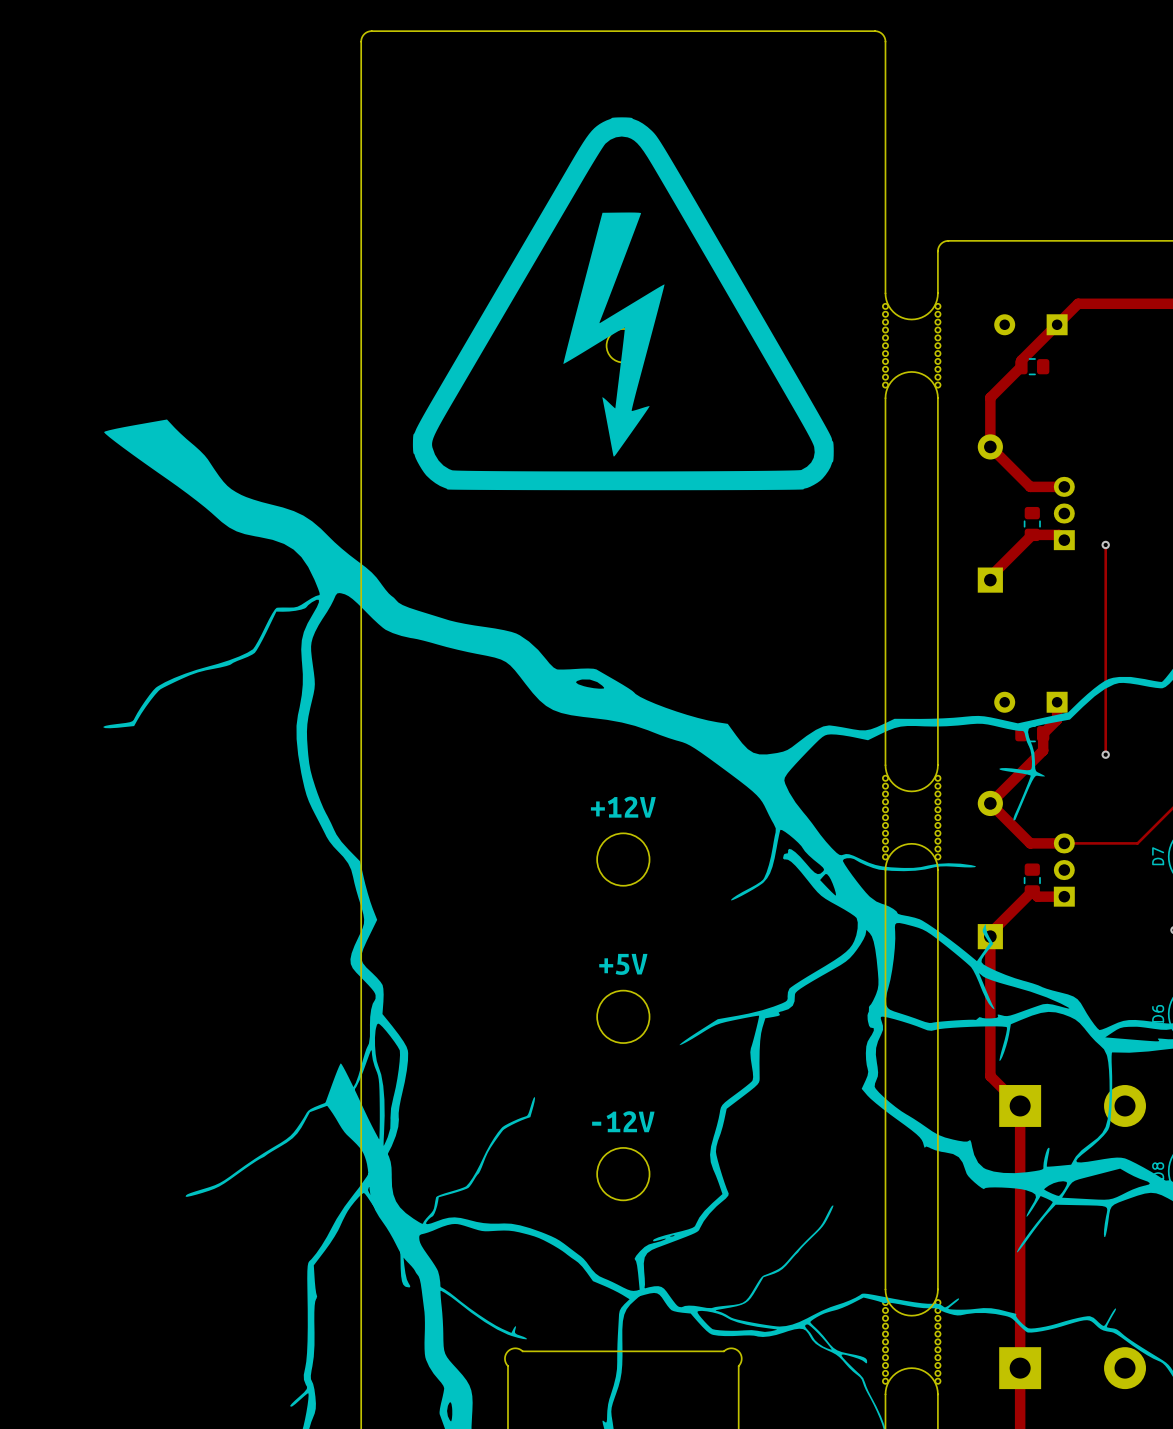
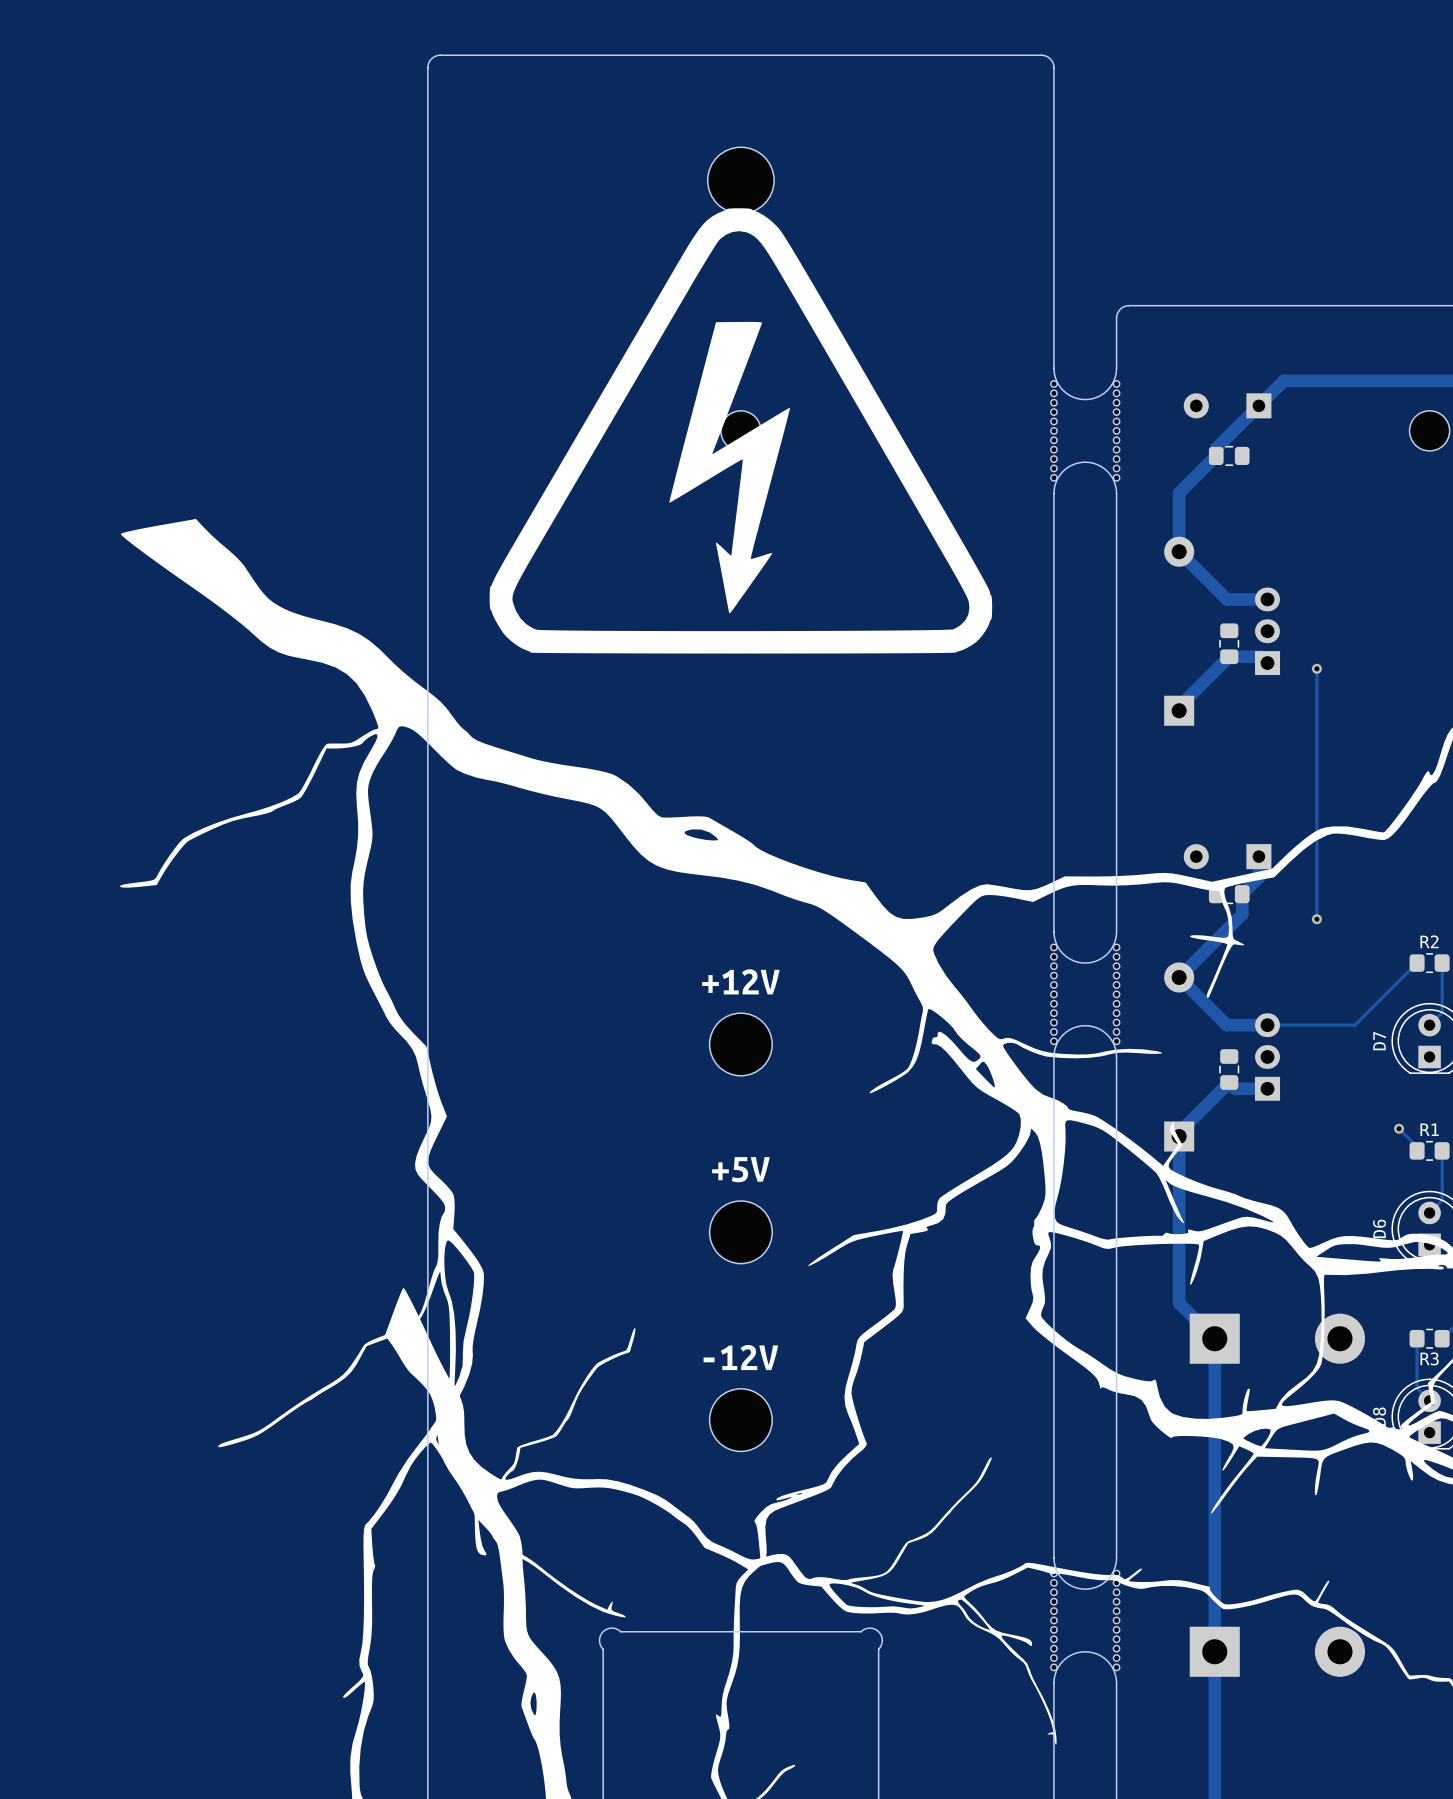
part: none -> (740, 180)
drawing position: (623, 303) -> (740, 430)

